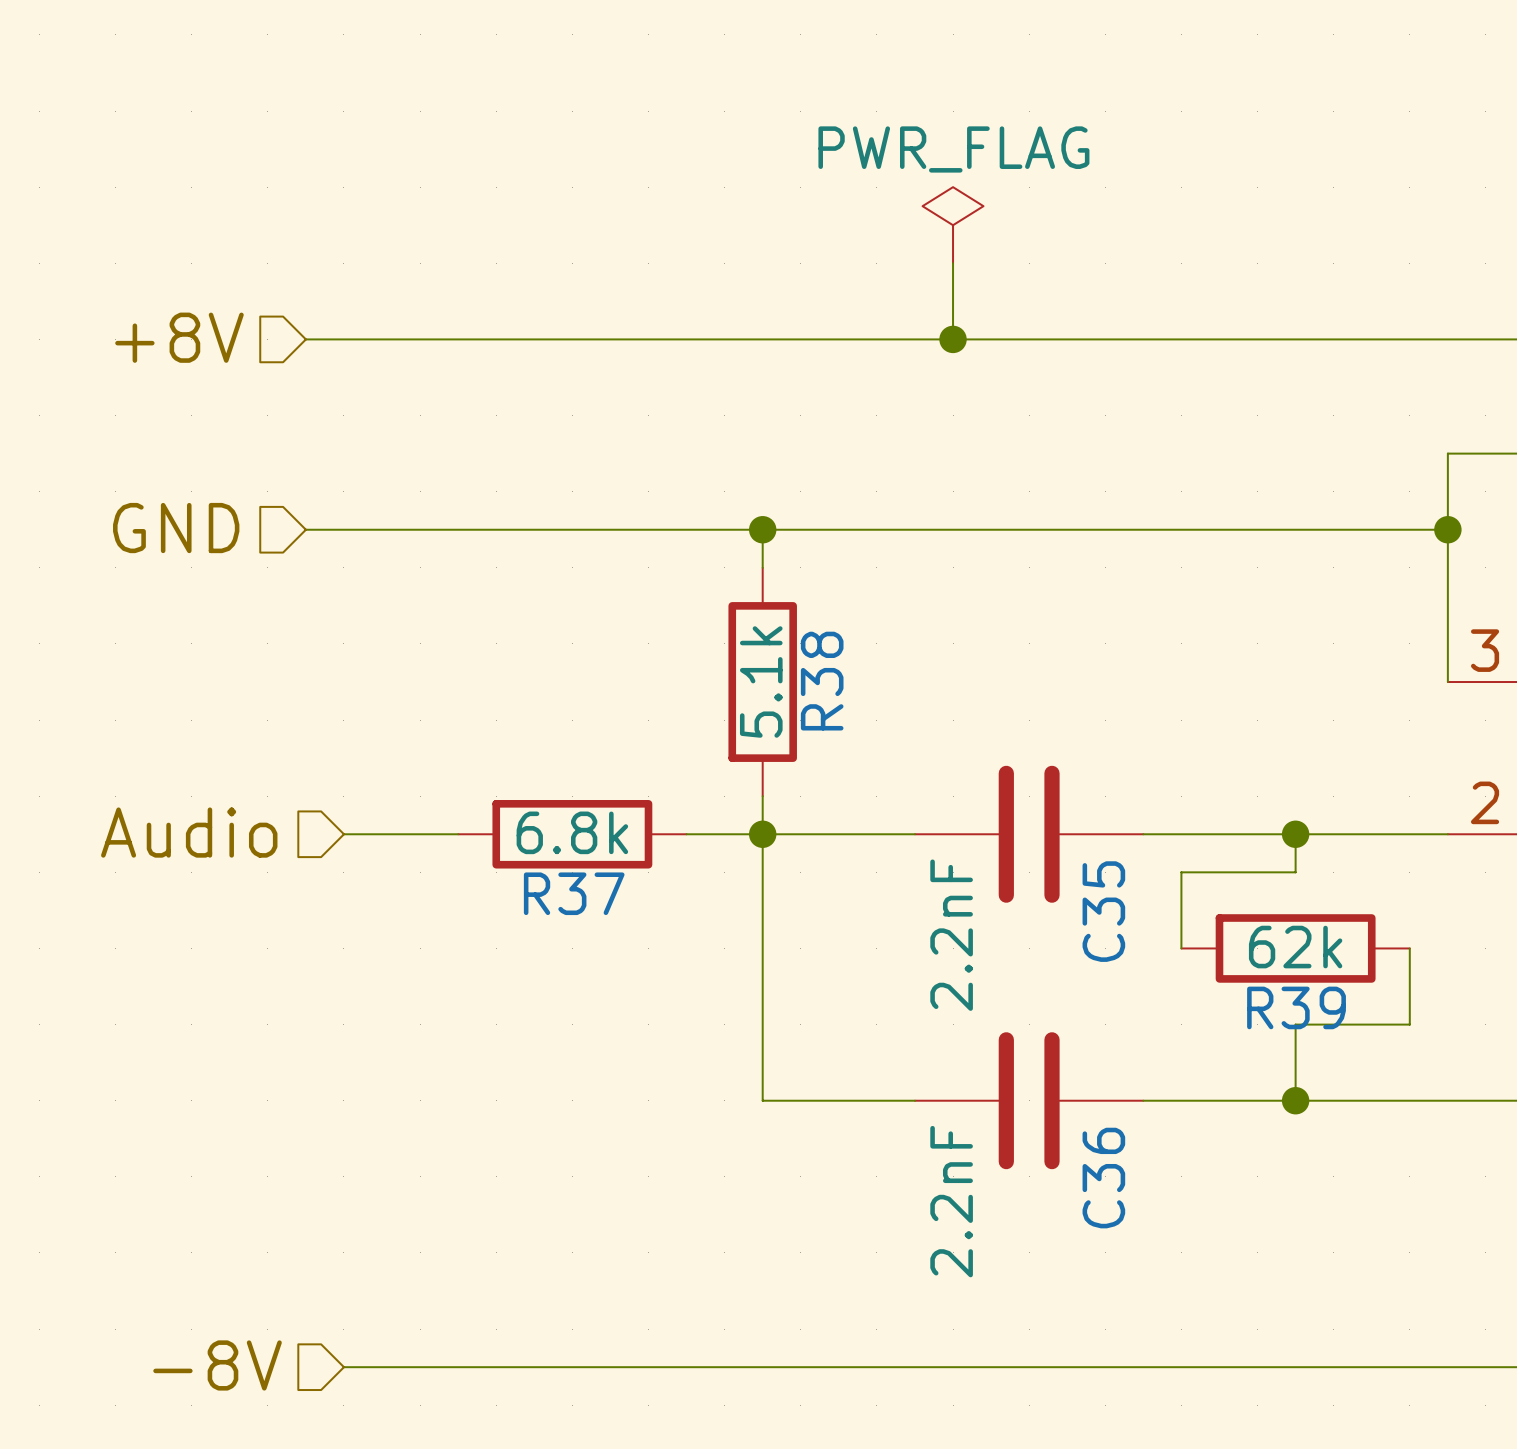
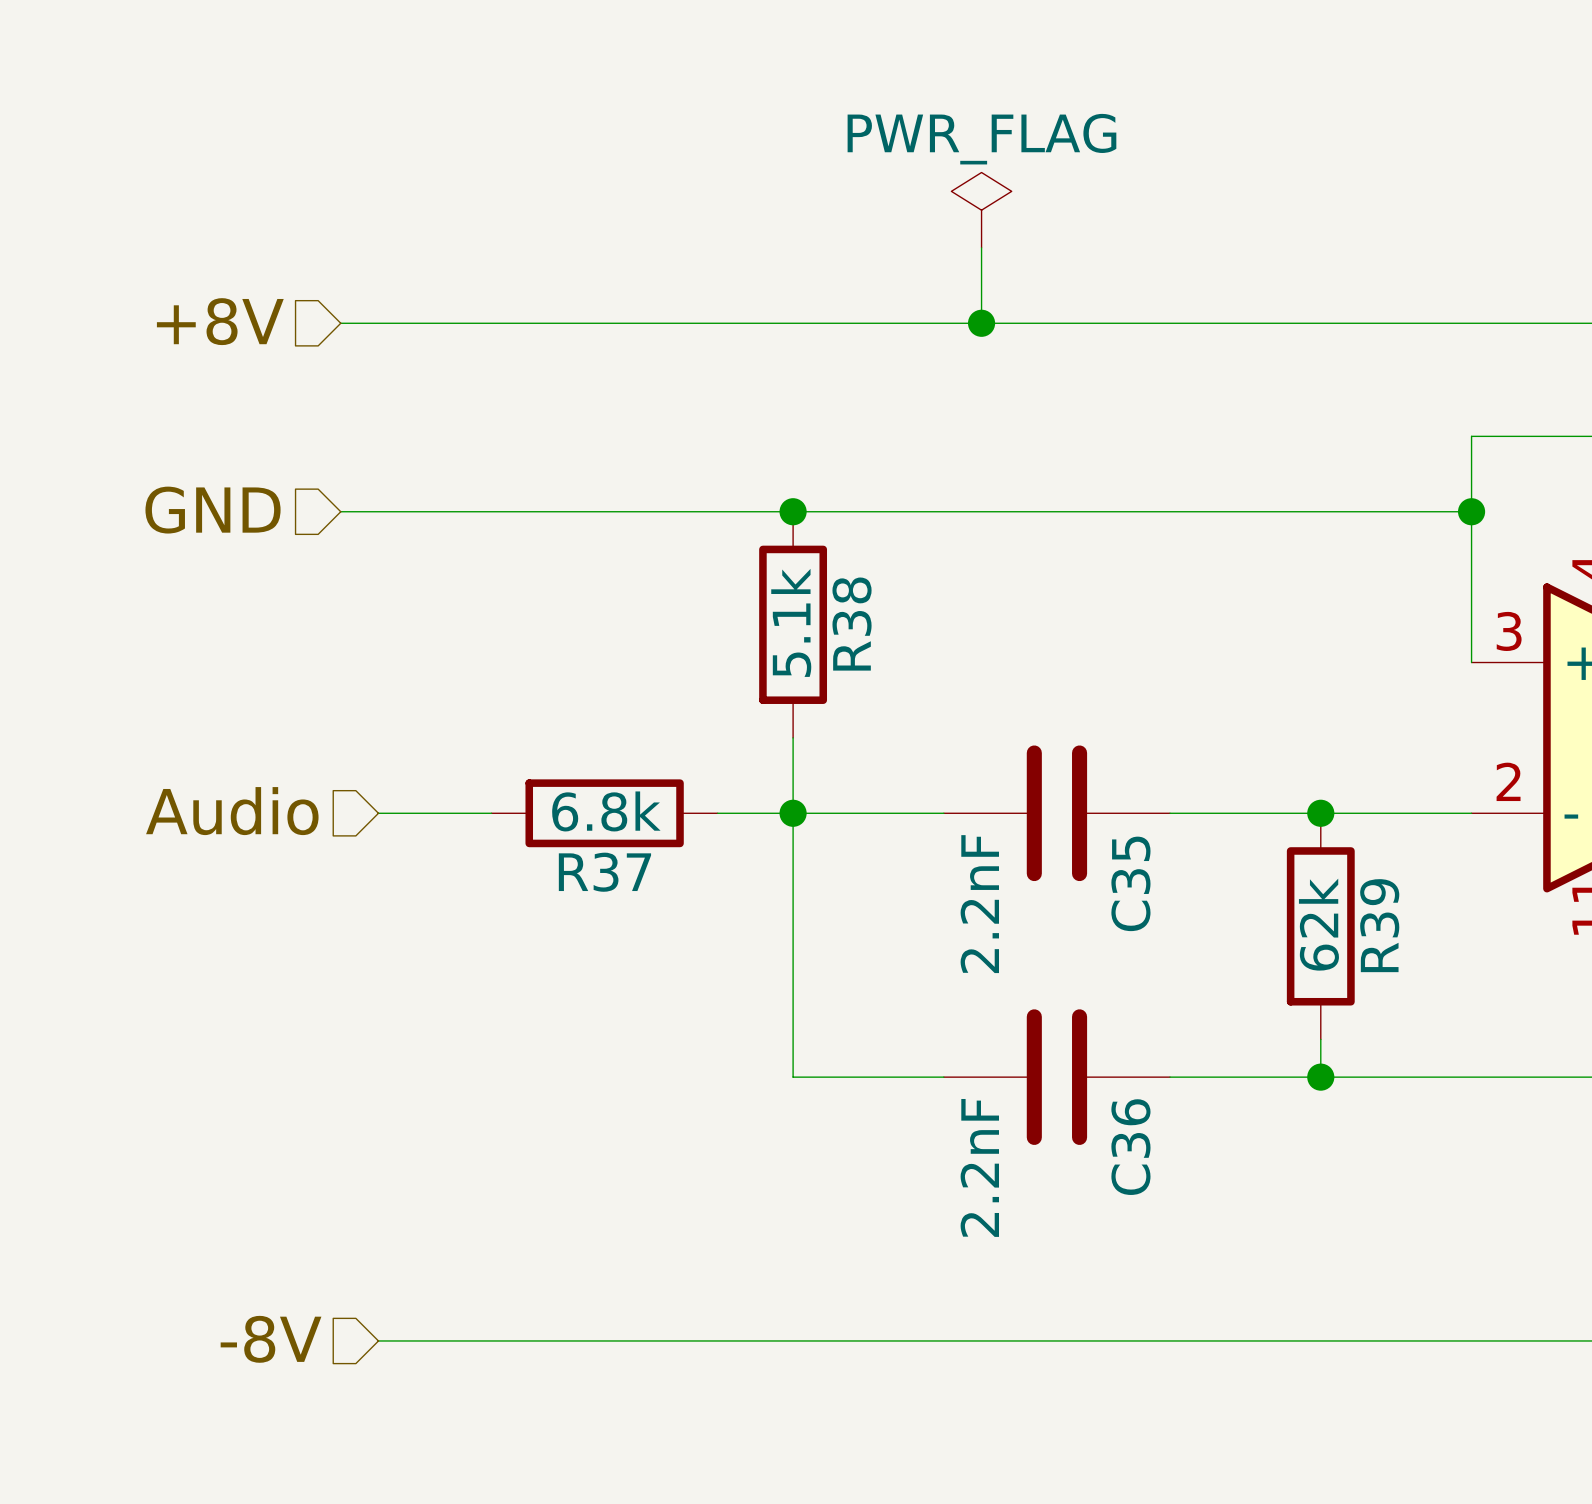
R38 position: (762, 682) -> (793, 624)
wire: (1295, 834) (1295, 872) (1181, 872) (1181, 948) -> none
R39 rotation: 0° (1295, 948) -> 90° clockwise (1320, 926)
wire: (1409, 948) (1409, 1024) (1295, 1024) (1295, 1062) -> none
R39 name position: R39 (1296, 1007) -> R39 (1379, 925)

